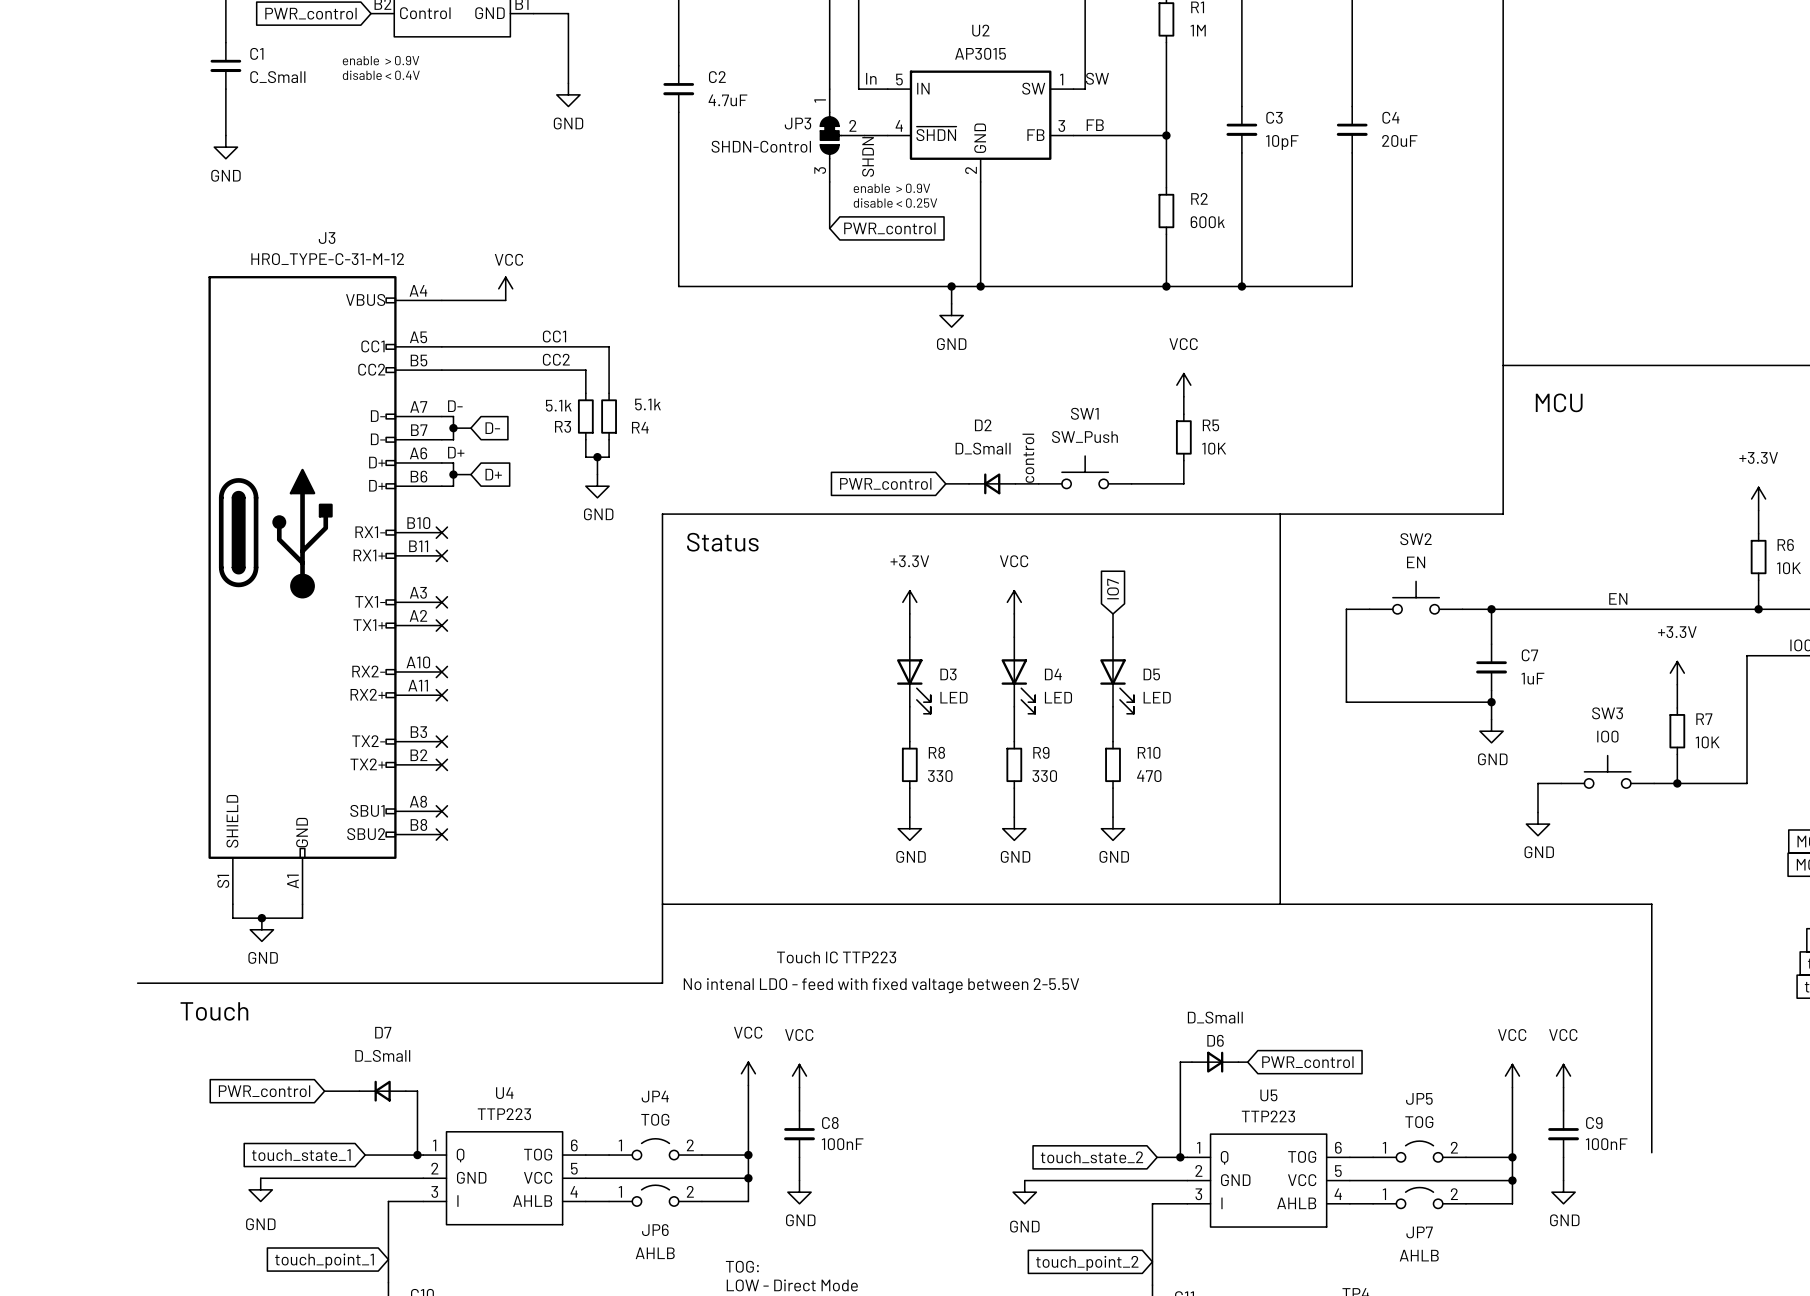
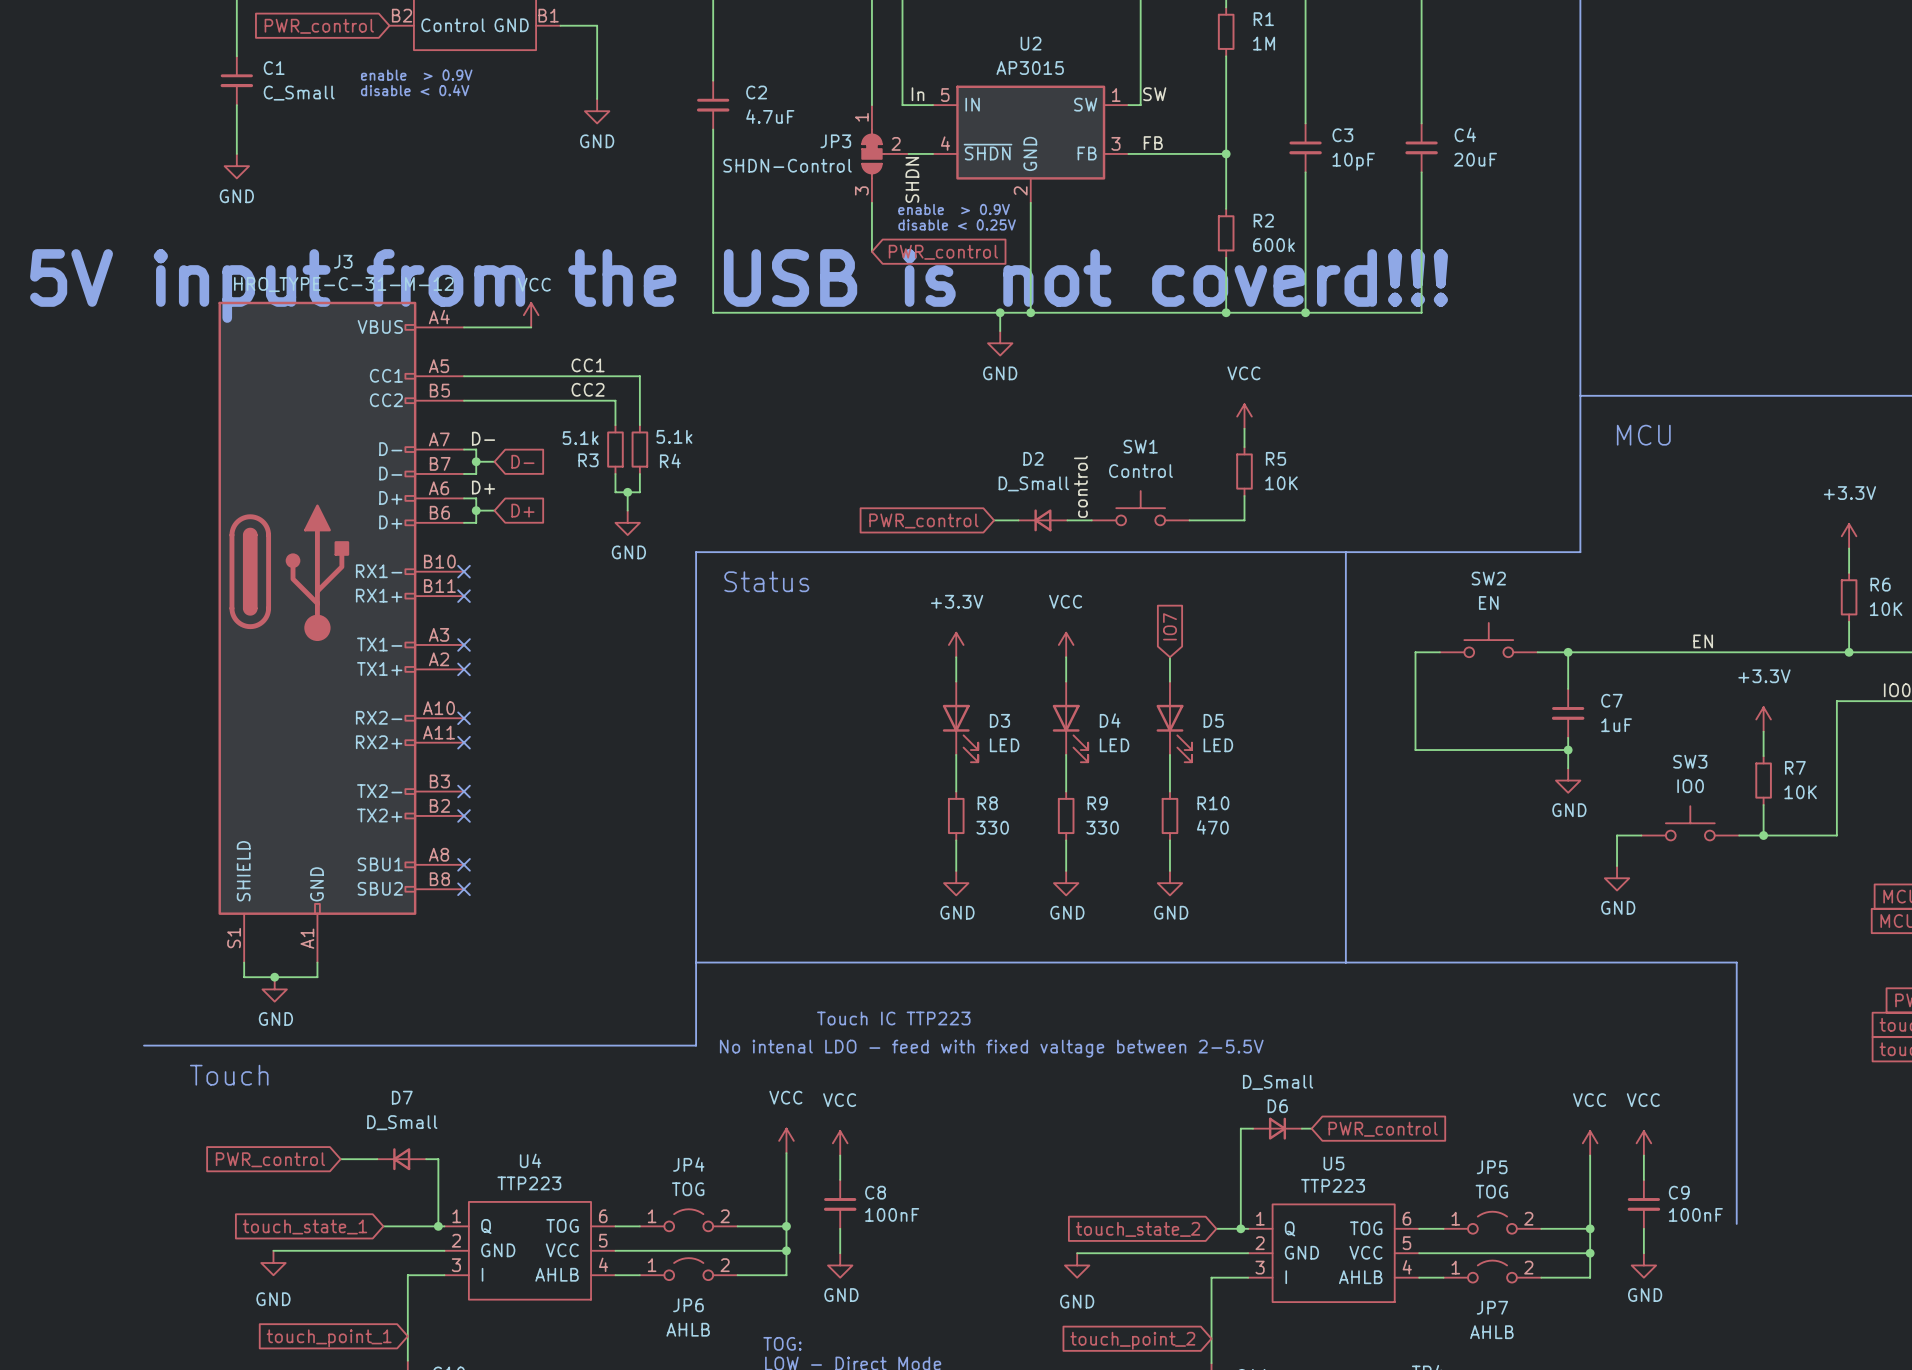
text: none -> 5V input from the USB is not coverd!!! (739, 285)
SW1 value: SW_Push (1084, 437) -> Control (1140, 471)

